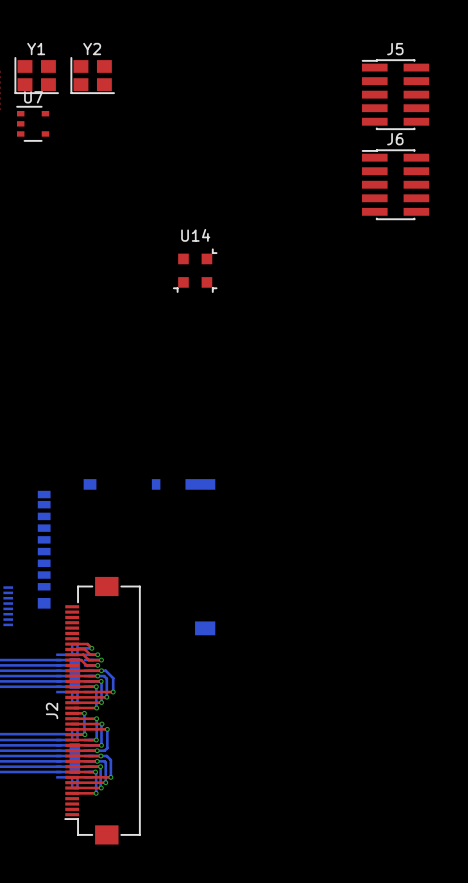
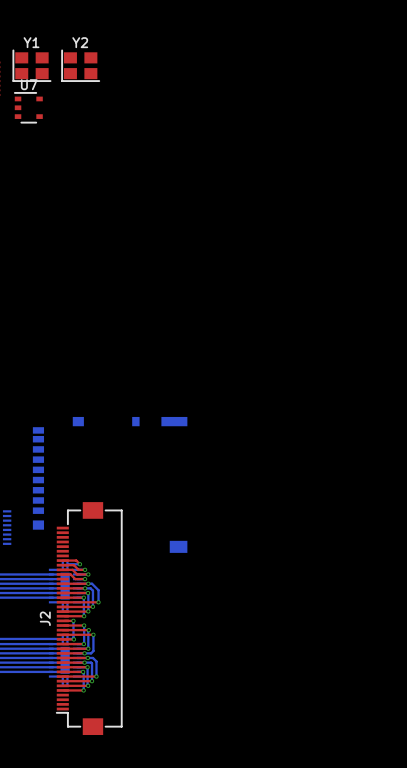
J5: (395, 94) -> none
J6: (395, 184) -> none
U14: (195, 270) -> none

